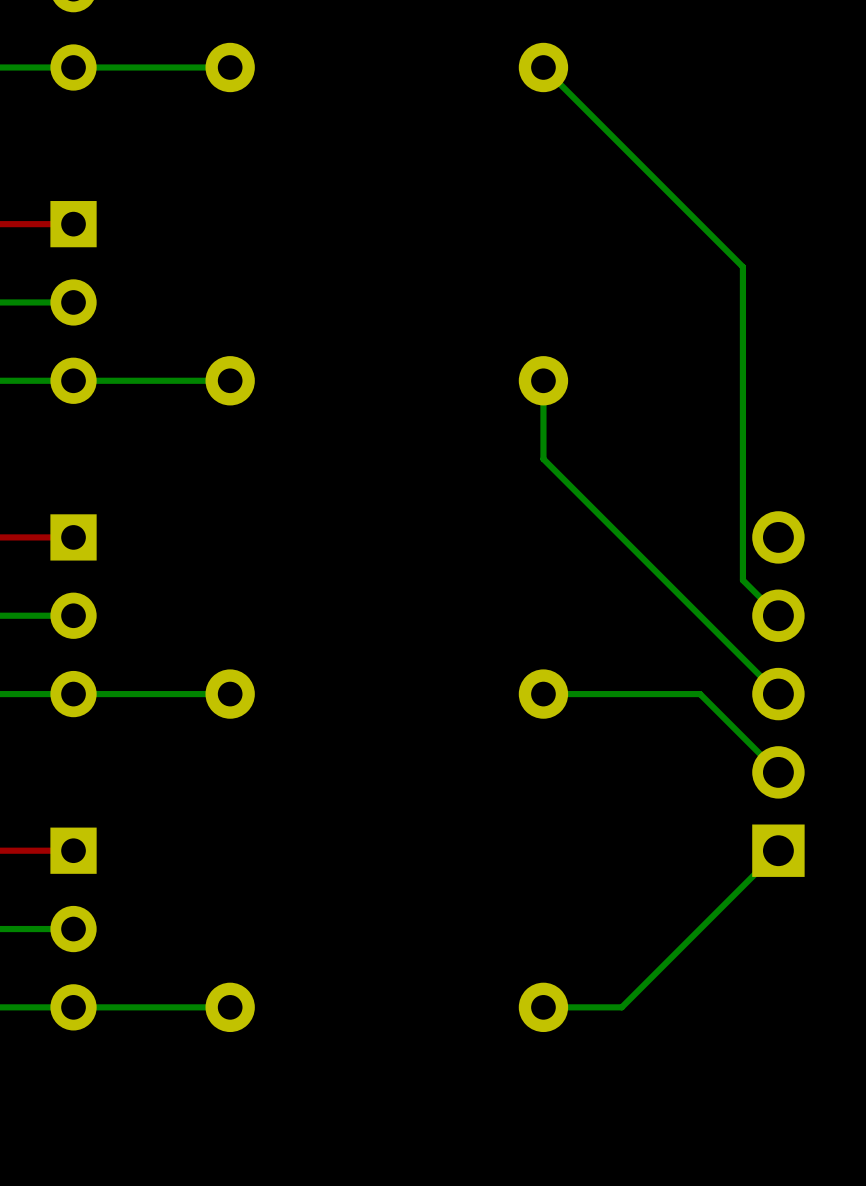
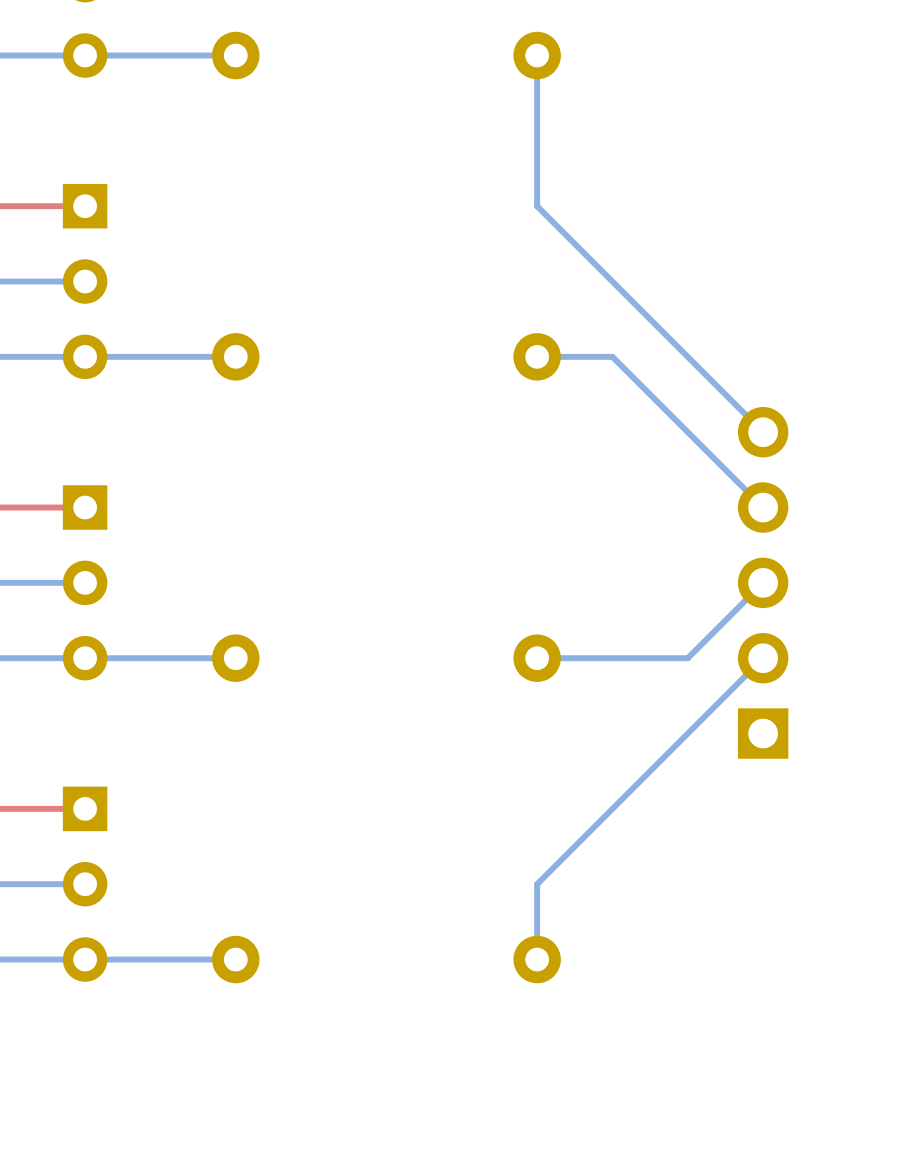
bottom track: (543, 67) (742, 266) (742, 580) (778, 615) -> (537, 55) (537, 206) (763, 432)
bottom track: (543, 380) (543, 459) (778, 694) -> (537, 356) (612, 356) (763, 507)
bottom track: (700, 694) (778, 772) -> (687, 658) (763, 582)
part position: (778, 694) -> (763, 582)
bottom track: (778, 850) (621, 1007) (543, 1007) -> (763, 658) (537, 884) (537, 959)

